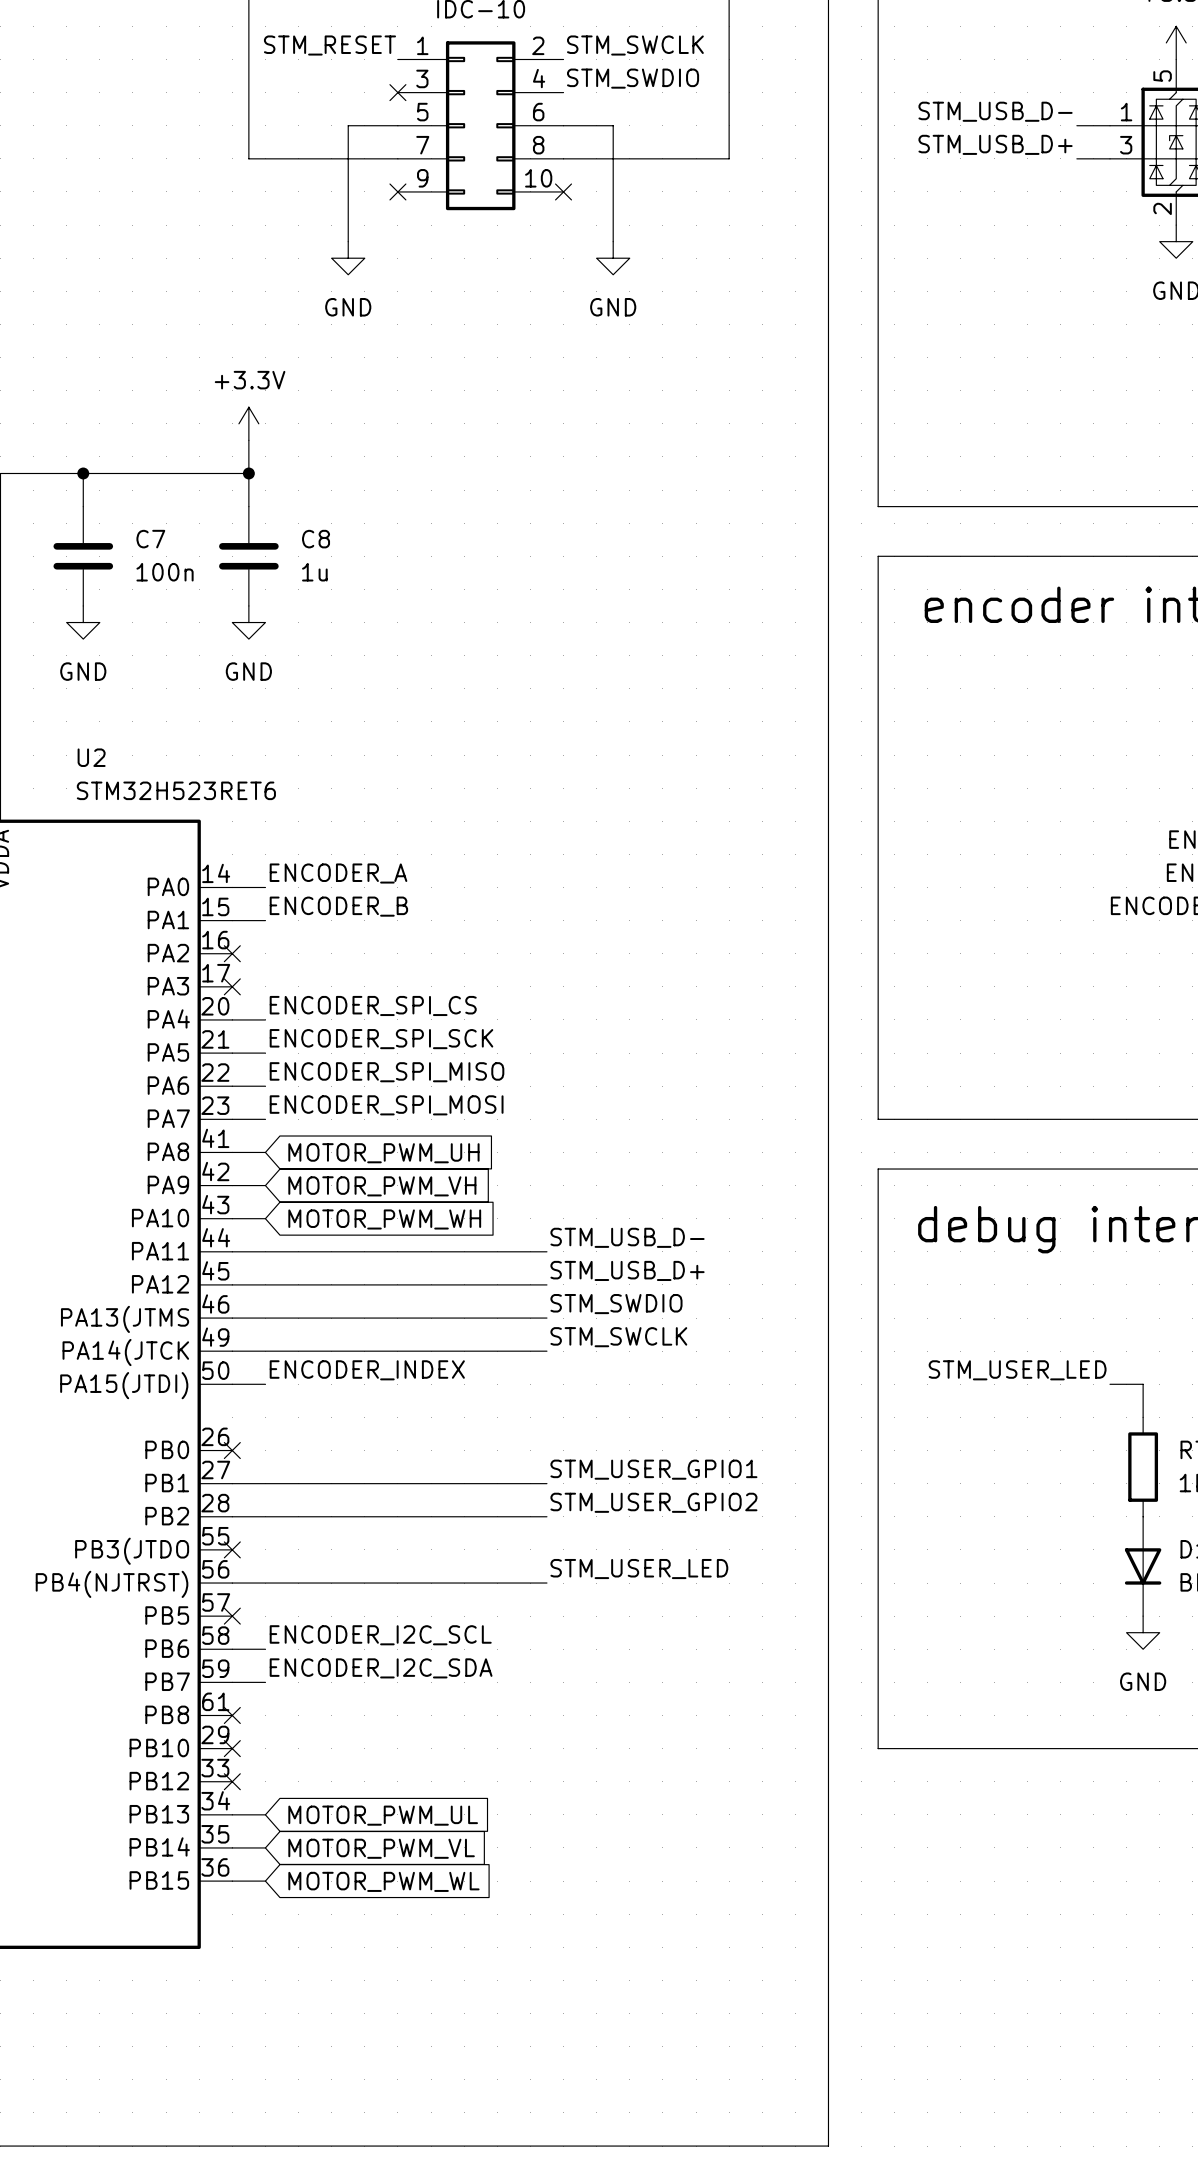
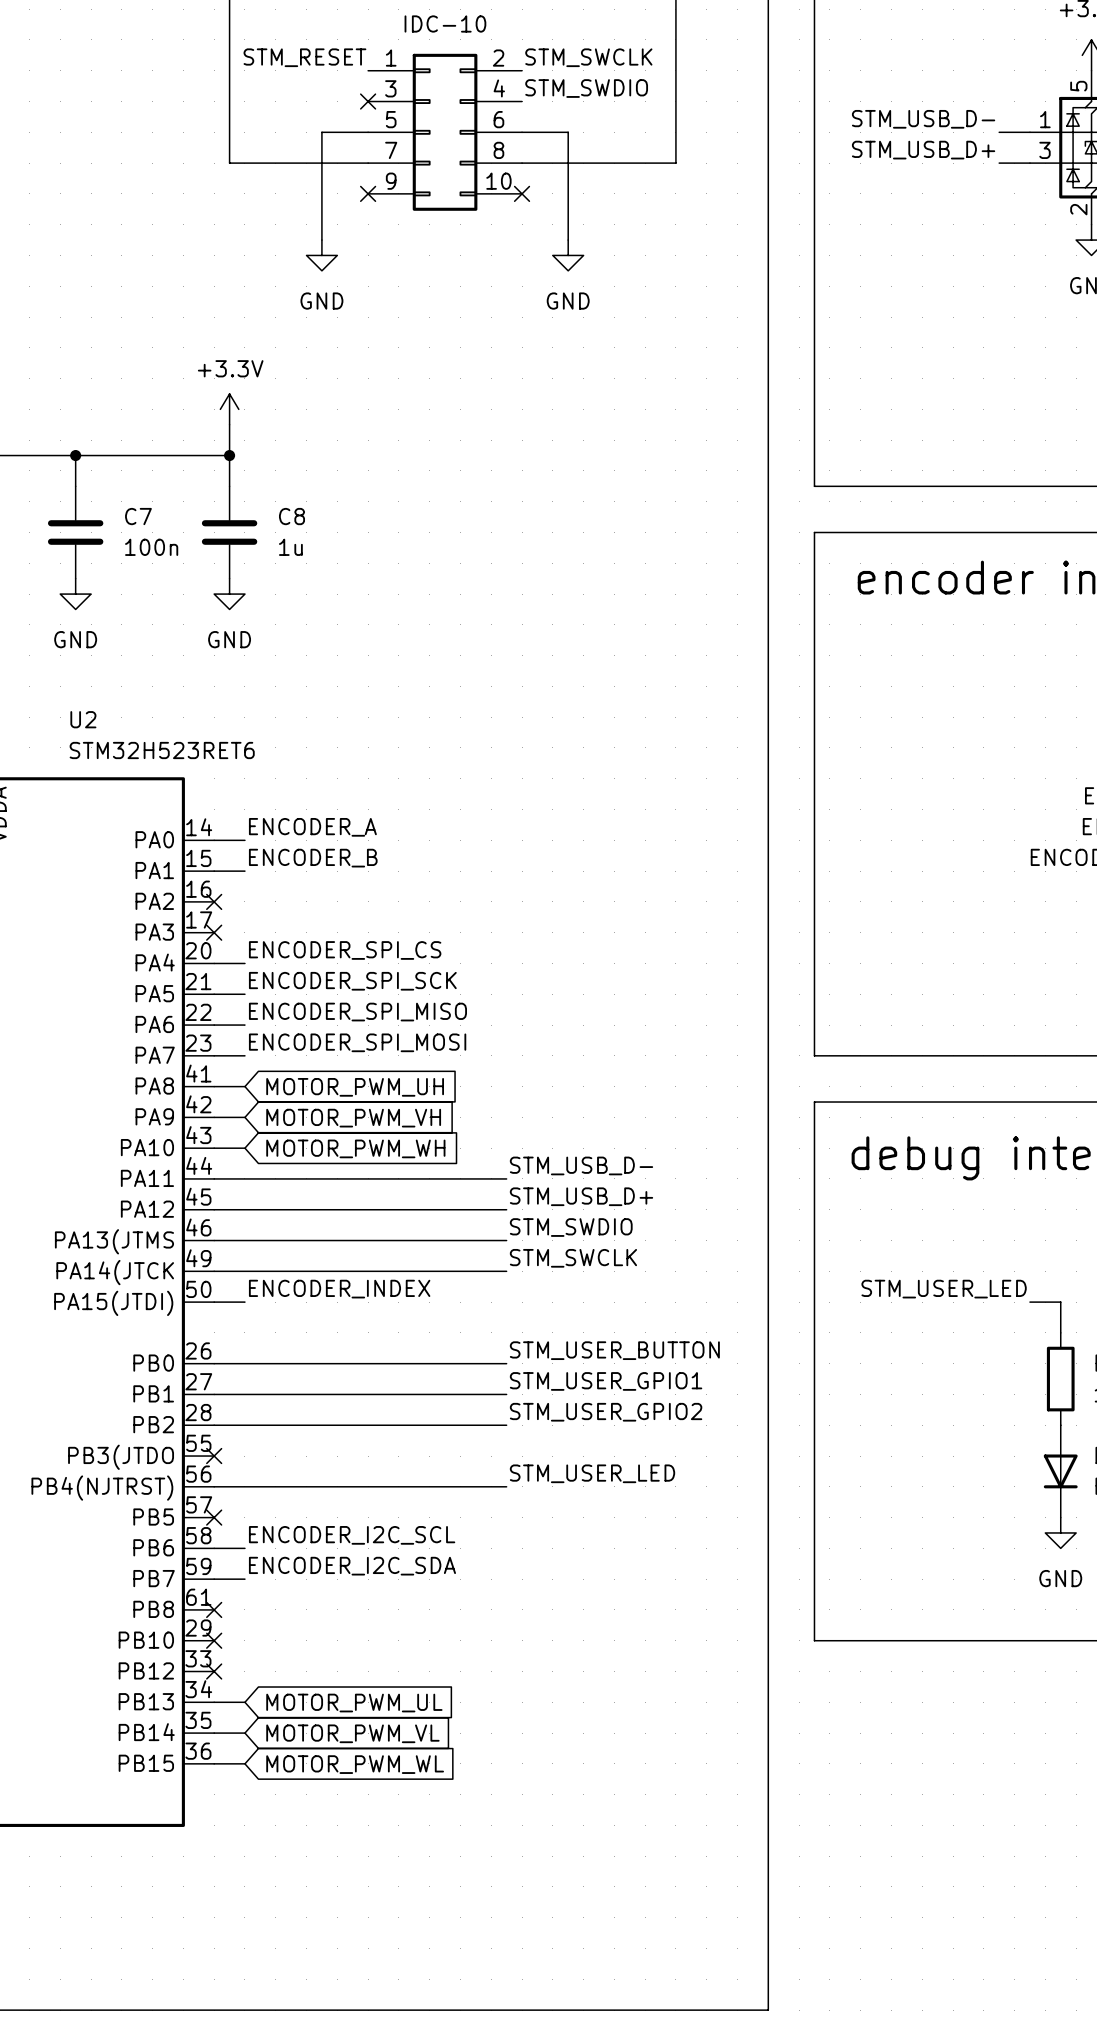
label: none -> STM_USER_BUTTON (614, 1350)
wire: none -> (214, 1363) (506, 1363)
no-connect mark: (232, 1450) -> none

